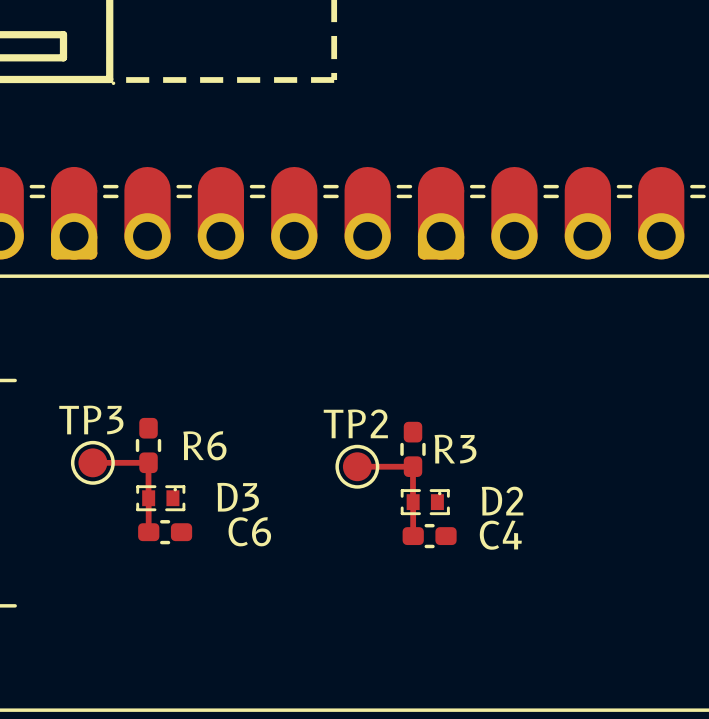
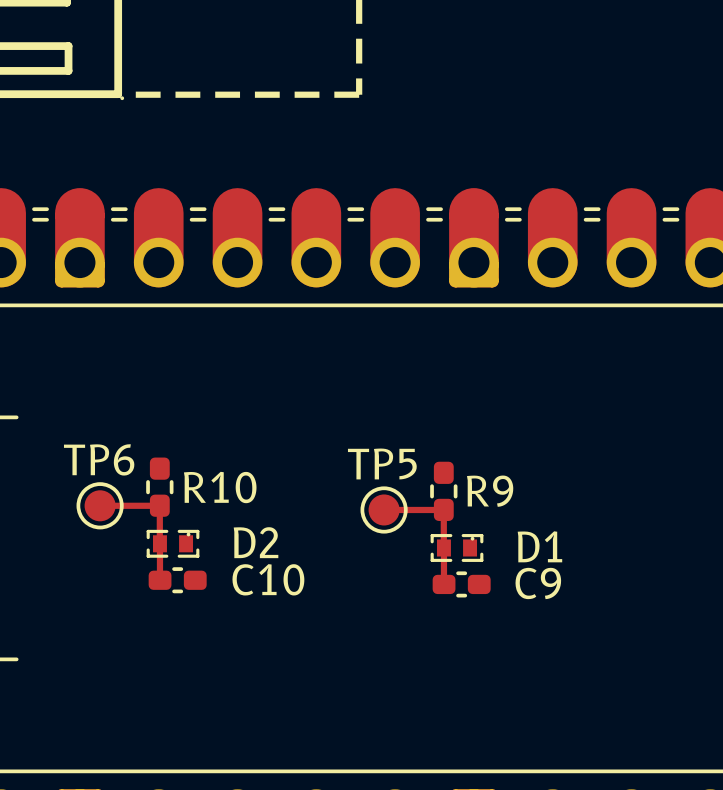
TP3 name: TP3 (91, 419) -> TP6 (99, 459)
TP2 name: TP2 (355, 423) -> TP5 (382, 463)
R6 name: R6 (204, 445) -> R10 (220, 487)
R3 name: R3 (455, 449) -> R9 (490, 491)
D3 name: D3 (238, 497) -> D2 (256, 542)
D2 name: D2 (502, 501) -> D1 (539, 546)
C6 name: C6 (249, 531) -> C10 (268, 579)
C4 name: C4 (500, 535) -> C9 (538, 583)

